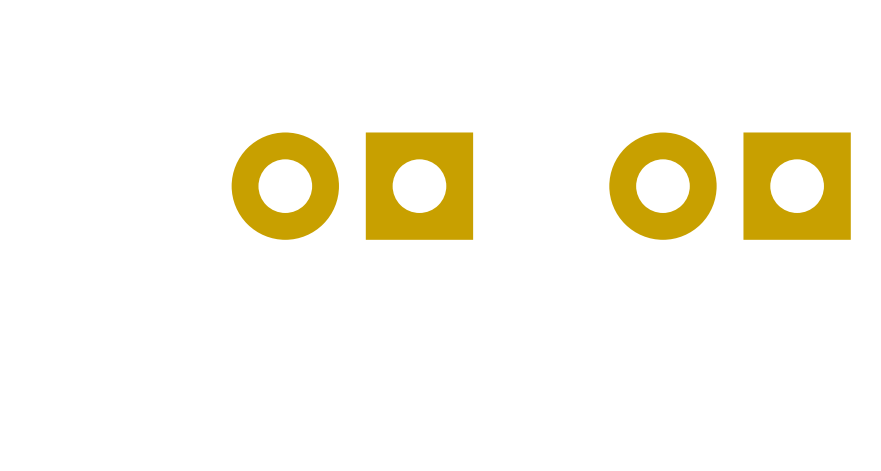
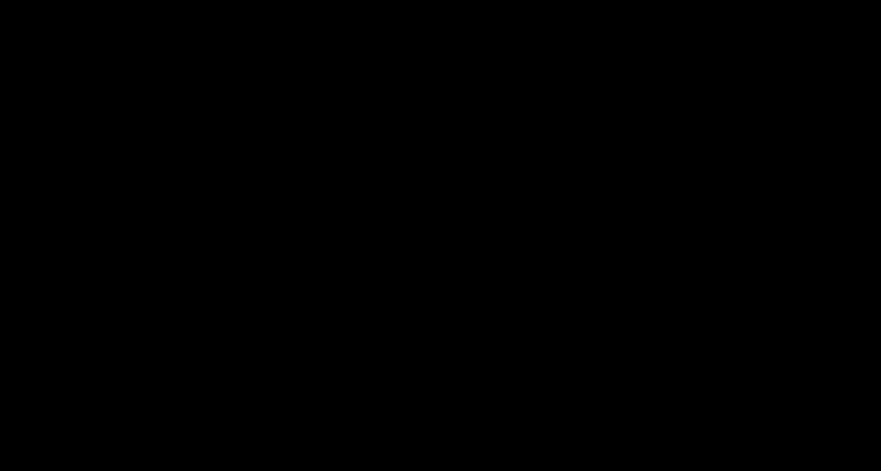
part: (352, 186) -> none
part: (730, 186) -> none

